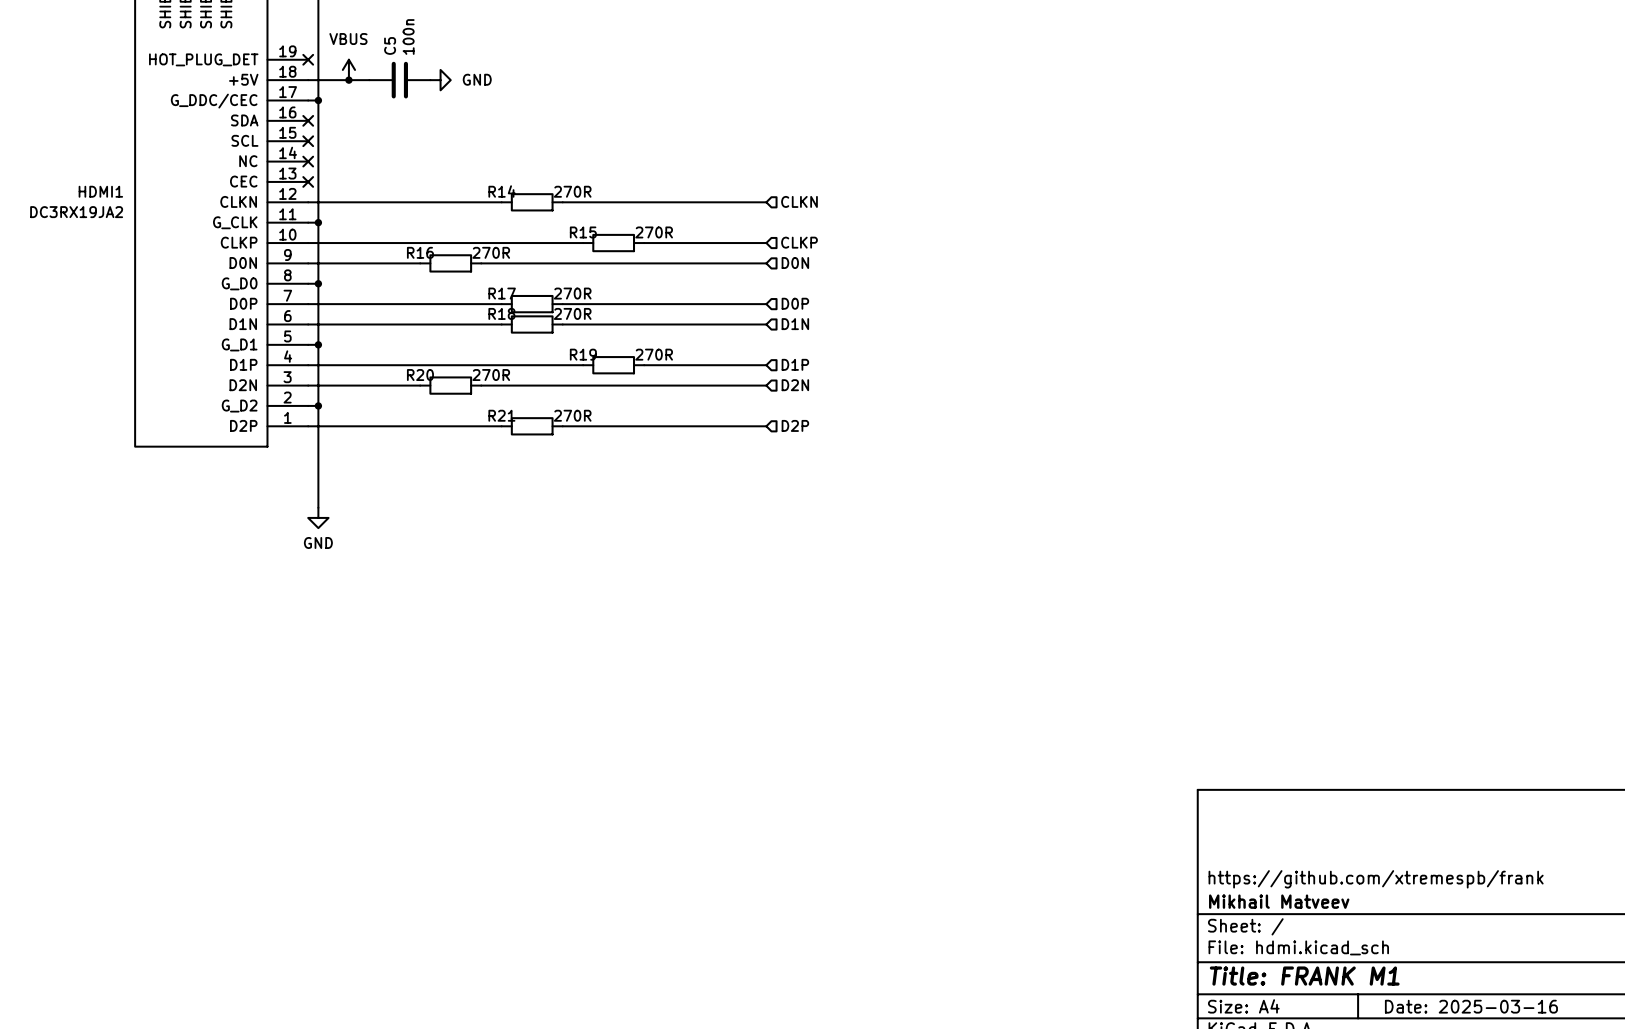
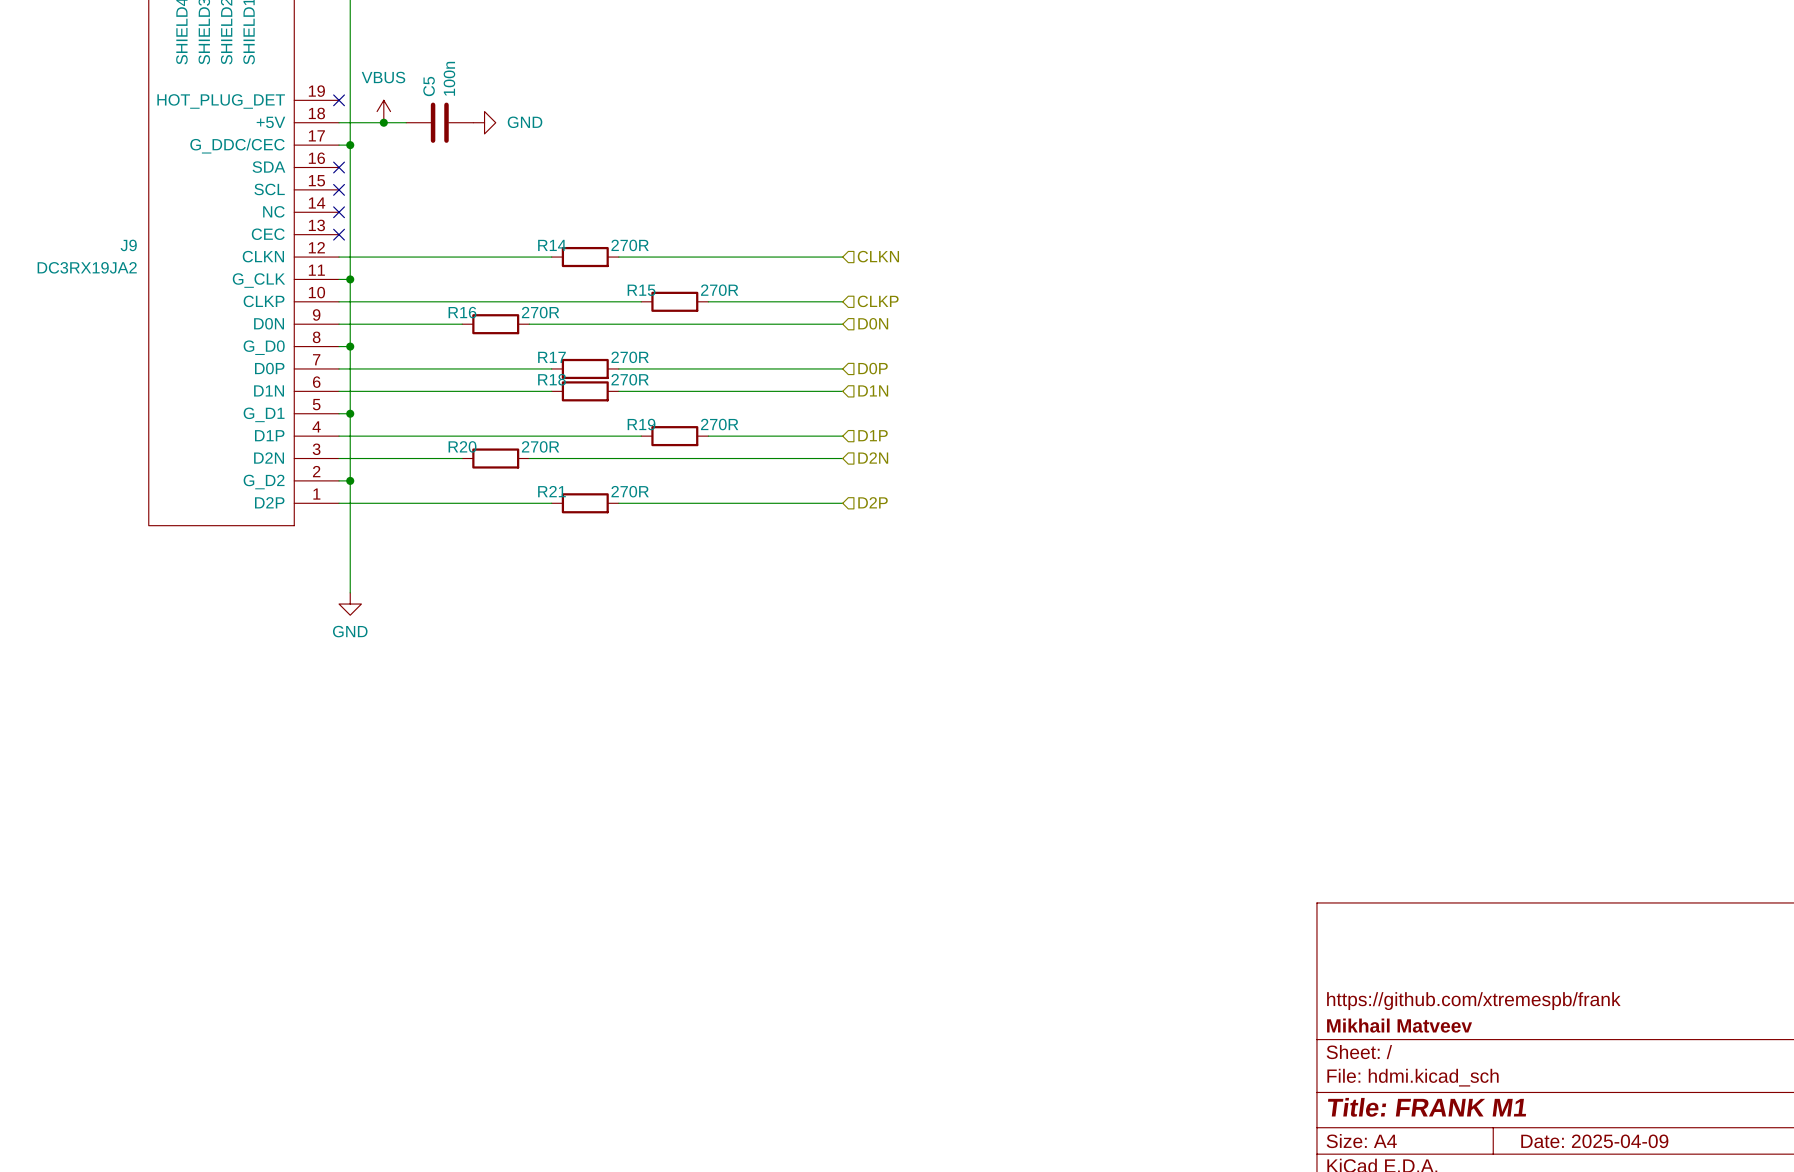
HDMI1 name: HDMI1 (100, 191) -> J9 (128, 245)
title block: Date: 2025-03-16 (1471, 1006) -> Date: 2025-04-09 (1594, 1141)

